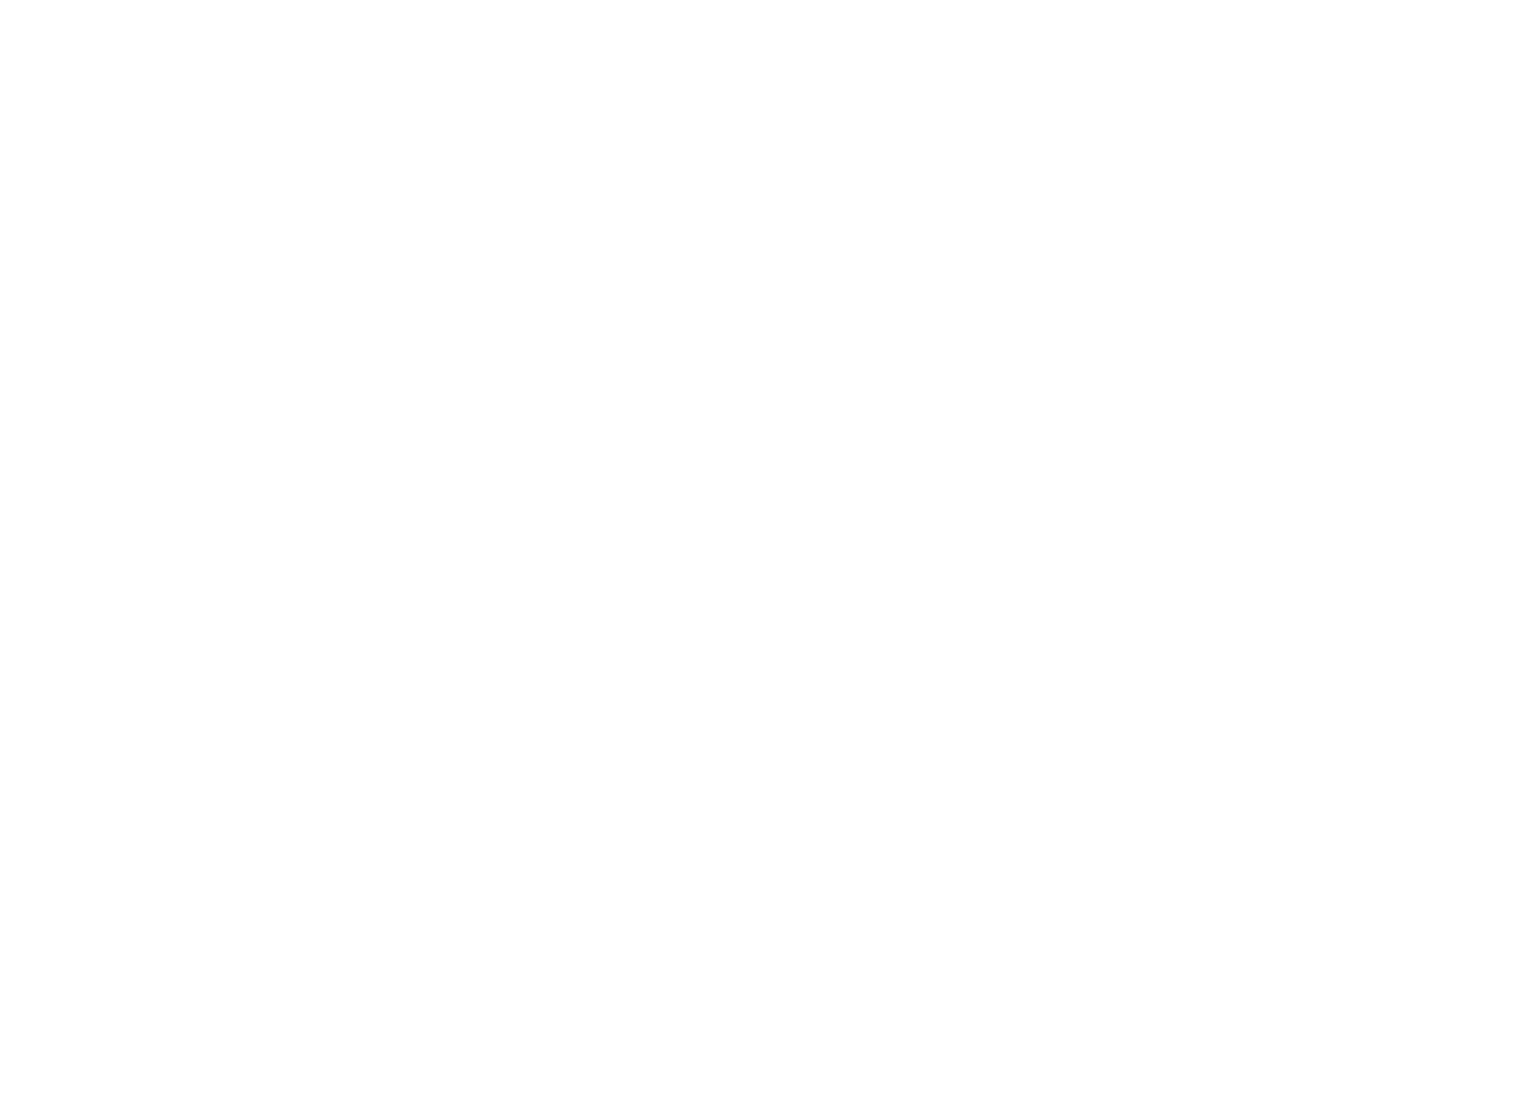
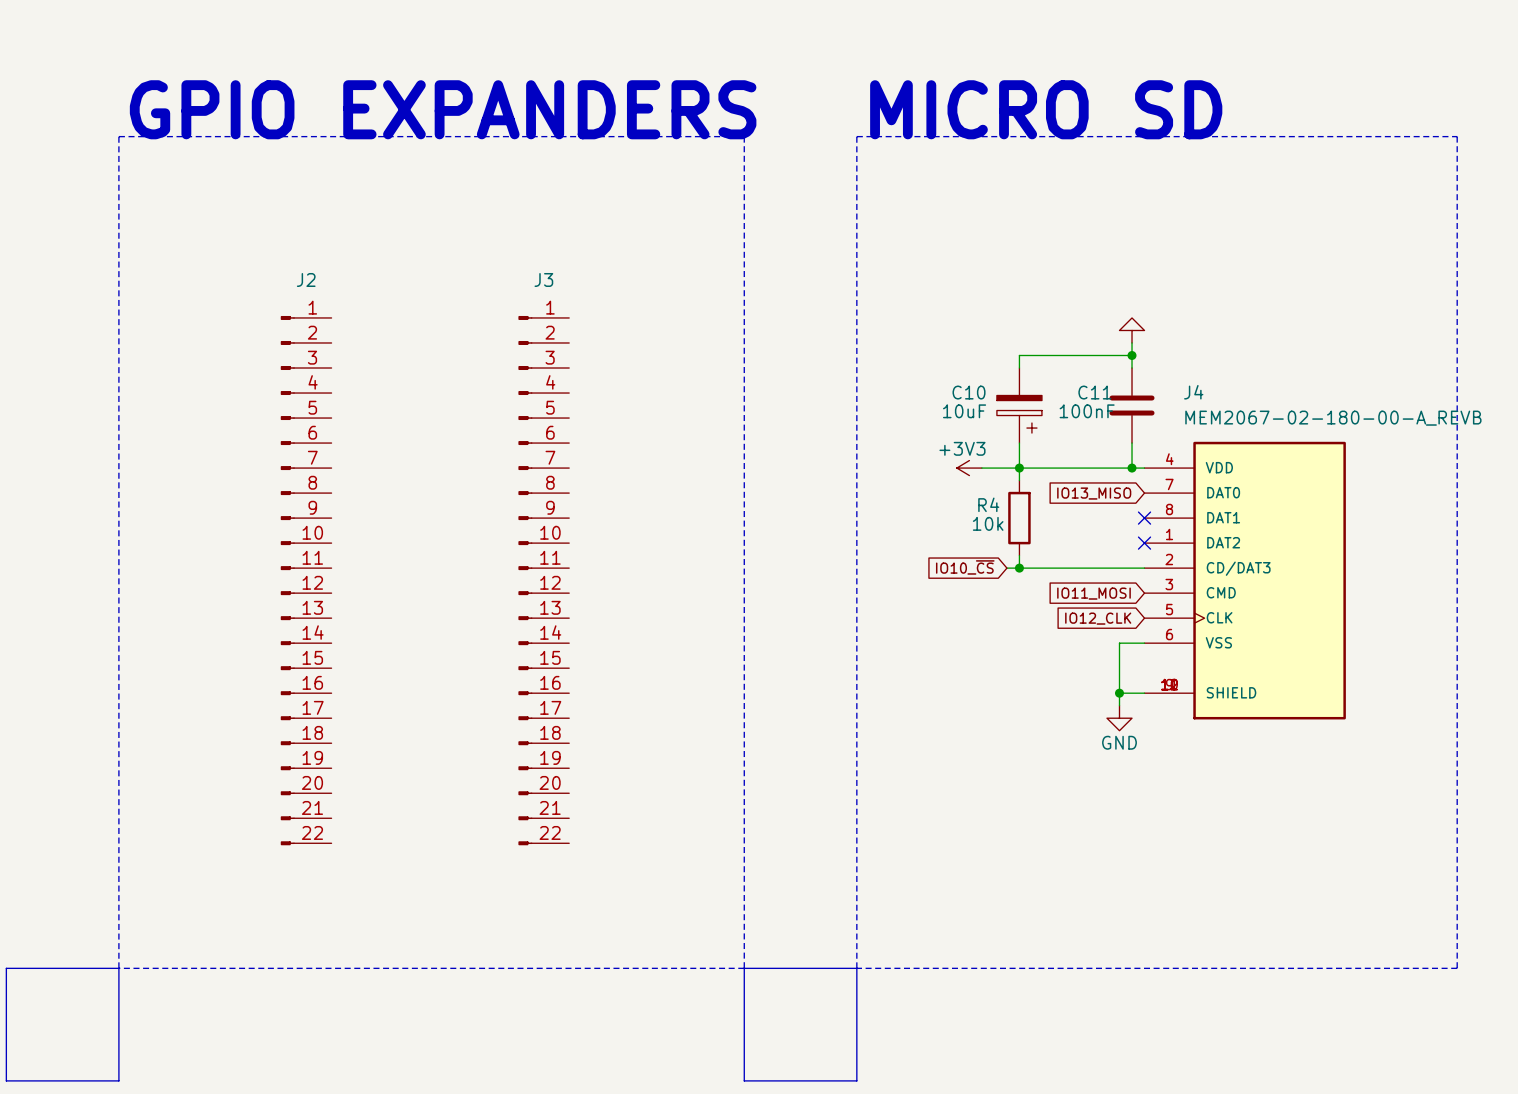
text: none -> GPIO EXPANDERS (443, 109)
text: none -> MICRO SD (1046, 109)
line: none -> (118, 136) (744, 136) (744, 968) (118, 968) (118, 136)
line: none -> (856, 136) (1457, 136) (1457, 968) (856, 968) (856, 136)
power symbol: none -> (1132, 330)
wire: none -> (1132, 342) (1132, 368)
wire: none -> (1132, 355) (1019, 355) (1019, 368)
junction: none -> (1132, 355)
C10: none -> 10uF (1019, 405)
C11: none -> 100nF (1132, 405)
wire: none -> (1019, 443) (1019, 480)
wire: none -> (1132, 443) (1132, 468)
power symbol: none -> +3V3 (969, 468)
wire: none -> (981, 468) (1144, 468)
junction: none -> (1019, 468)
junction: none -> (1132, 468)
global label: none -> IO13_MISO (1094, 493)
R4: none -> 10k (1019, 518)
no-connect mark: none -> (1144, 518)
no-connect mark: none -> (1144, 543)
wire: none -> (1019, 555) (1019, 568)
global label: none -> IO10_~{CS} (965, 567)
wire: none -> (1006, 568) (1144, 568)
junction: none -> (1019, 568)
J2: none -> (306, 580)
J3: none -> (543, 580)
J4: none -> MEM2067-02-180-00-A_REVB (1245, 580)
global label: none -> IO11_MOSI (1093, 593)
global label: none -> IO12_CLK (1098, 618)
wire: none -> (1144, 643) (1119, 643) (1119, 705)
wire: none -> (1119, 693) (1144, 693)
junction: none -> (1119, 693)
power symbol: none -> GND (1119, 718)
bus: none -> (6, 968) (6, 1080) (118, 1080) (118, 968) (6, 968)
bus: none -> (744, 968) (856, 968) (856, 1080) (744, 1080) (744, 968)

